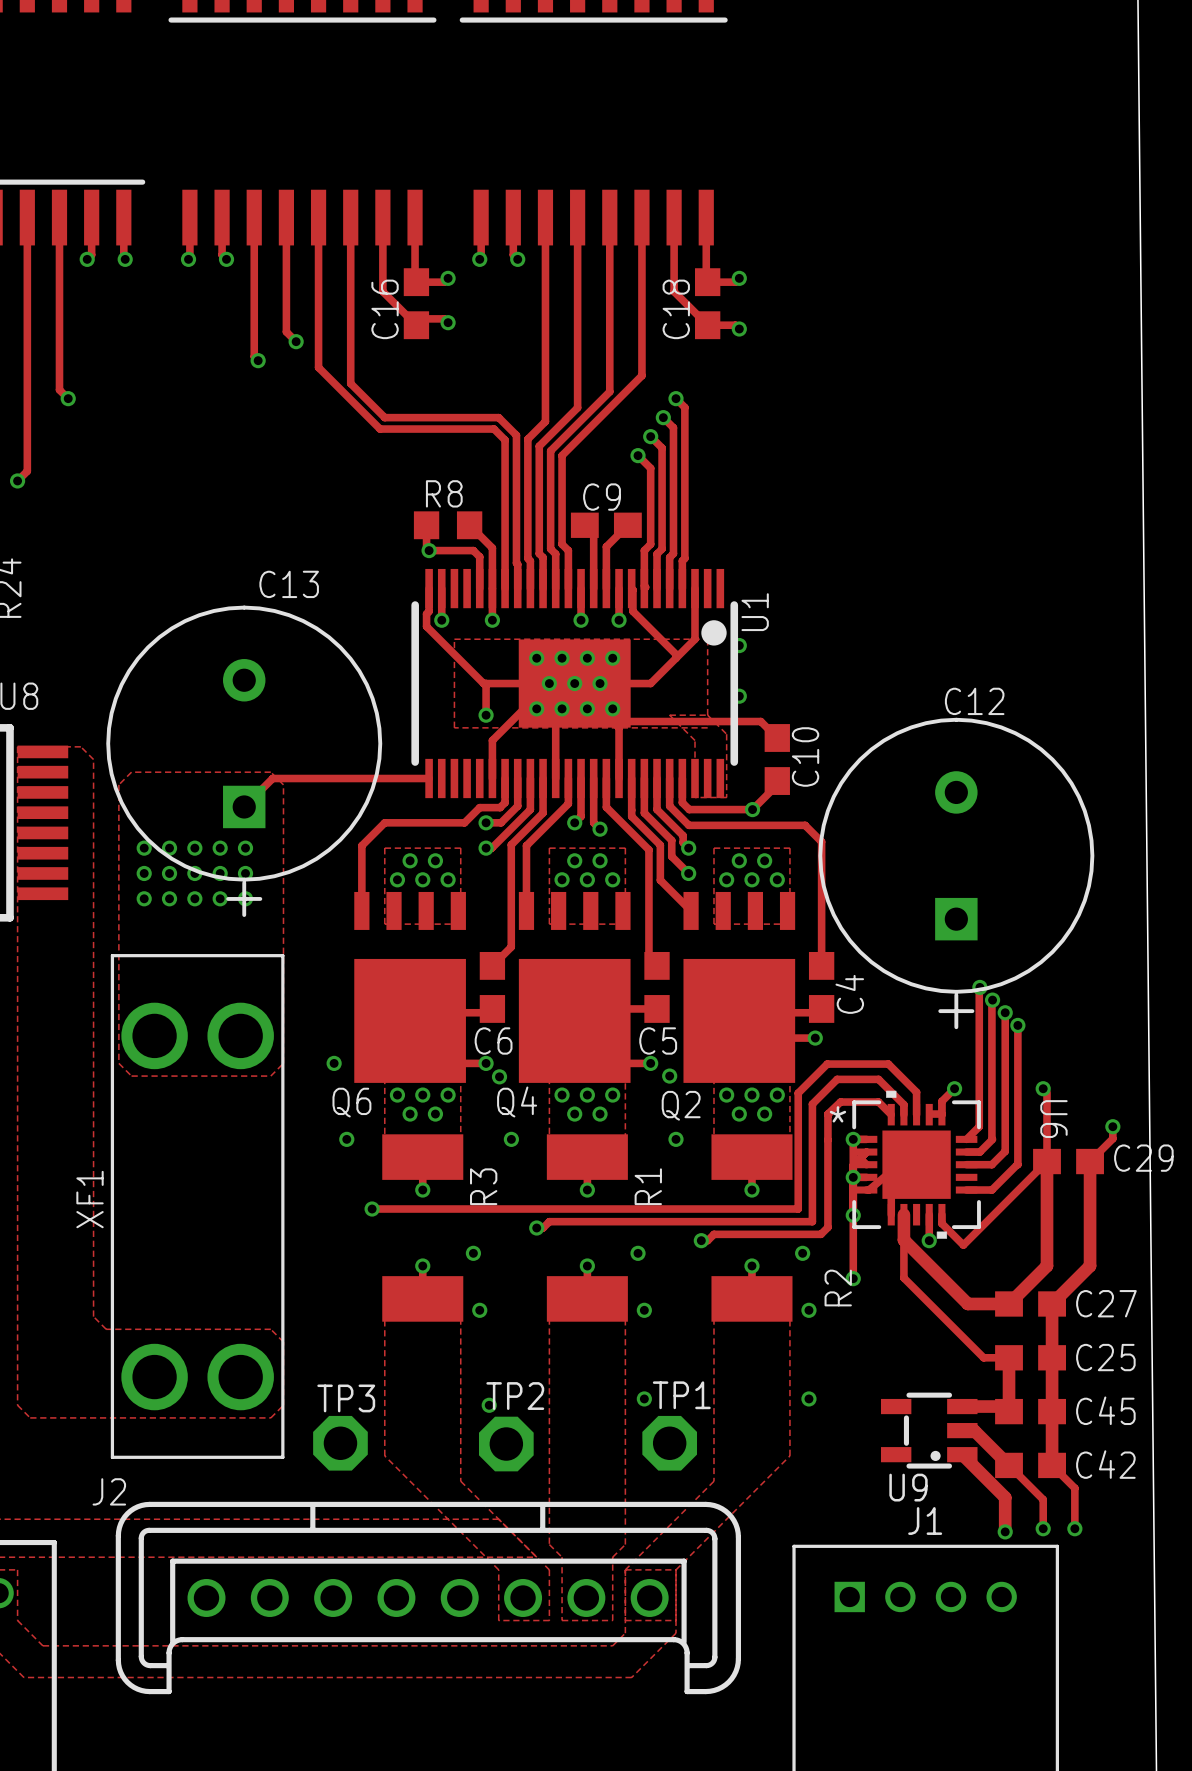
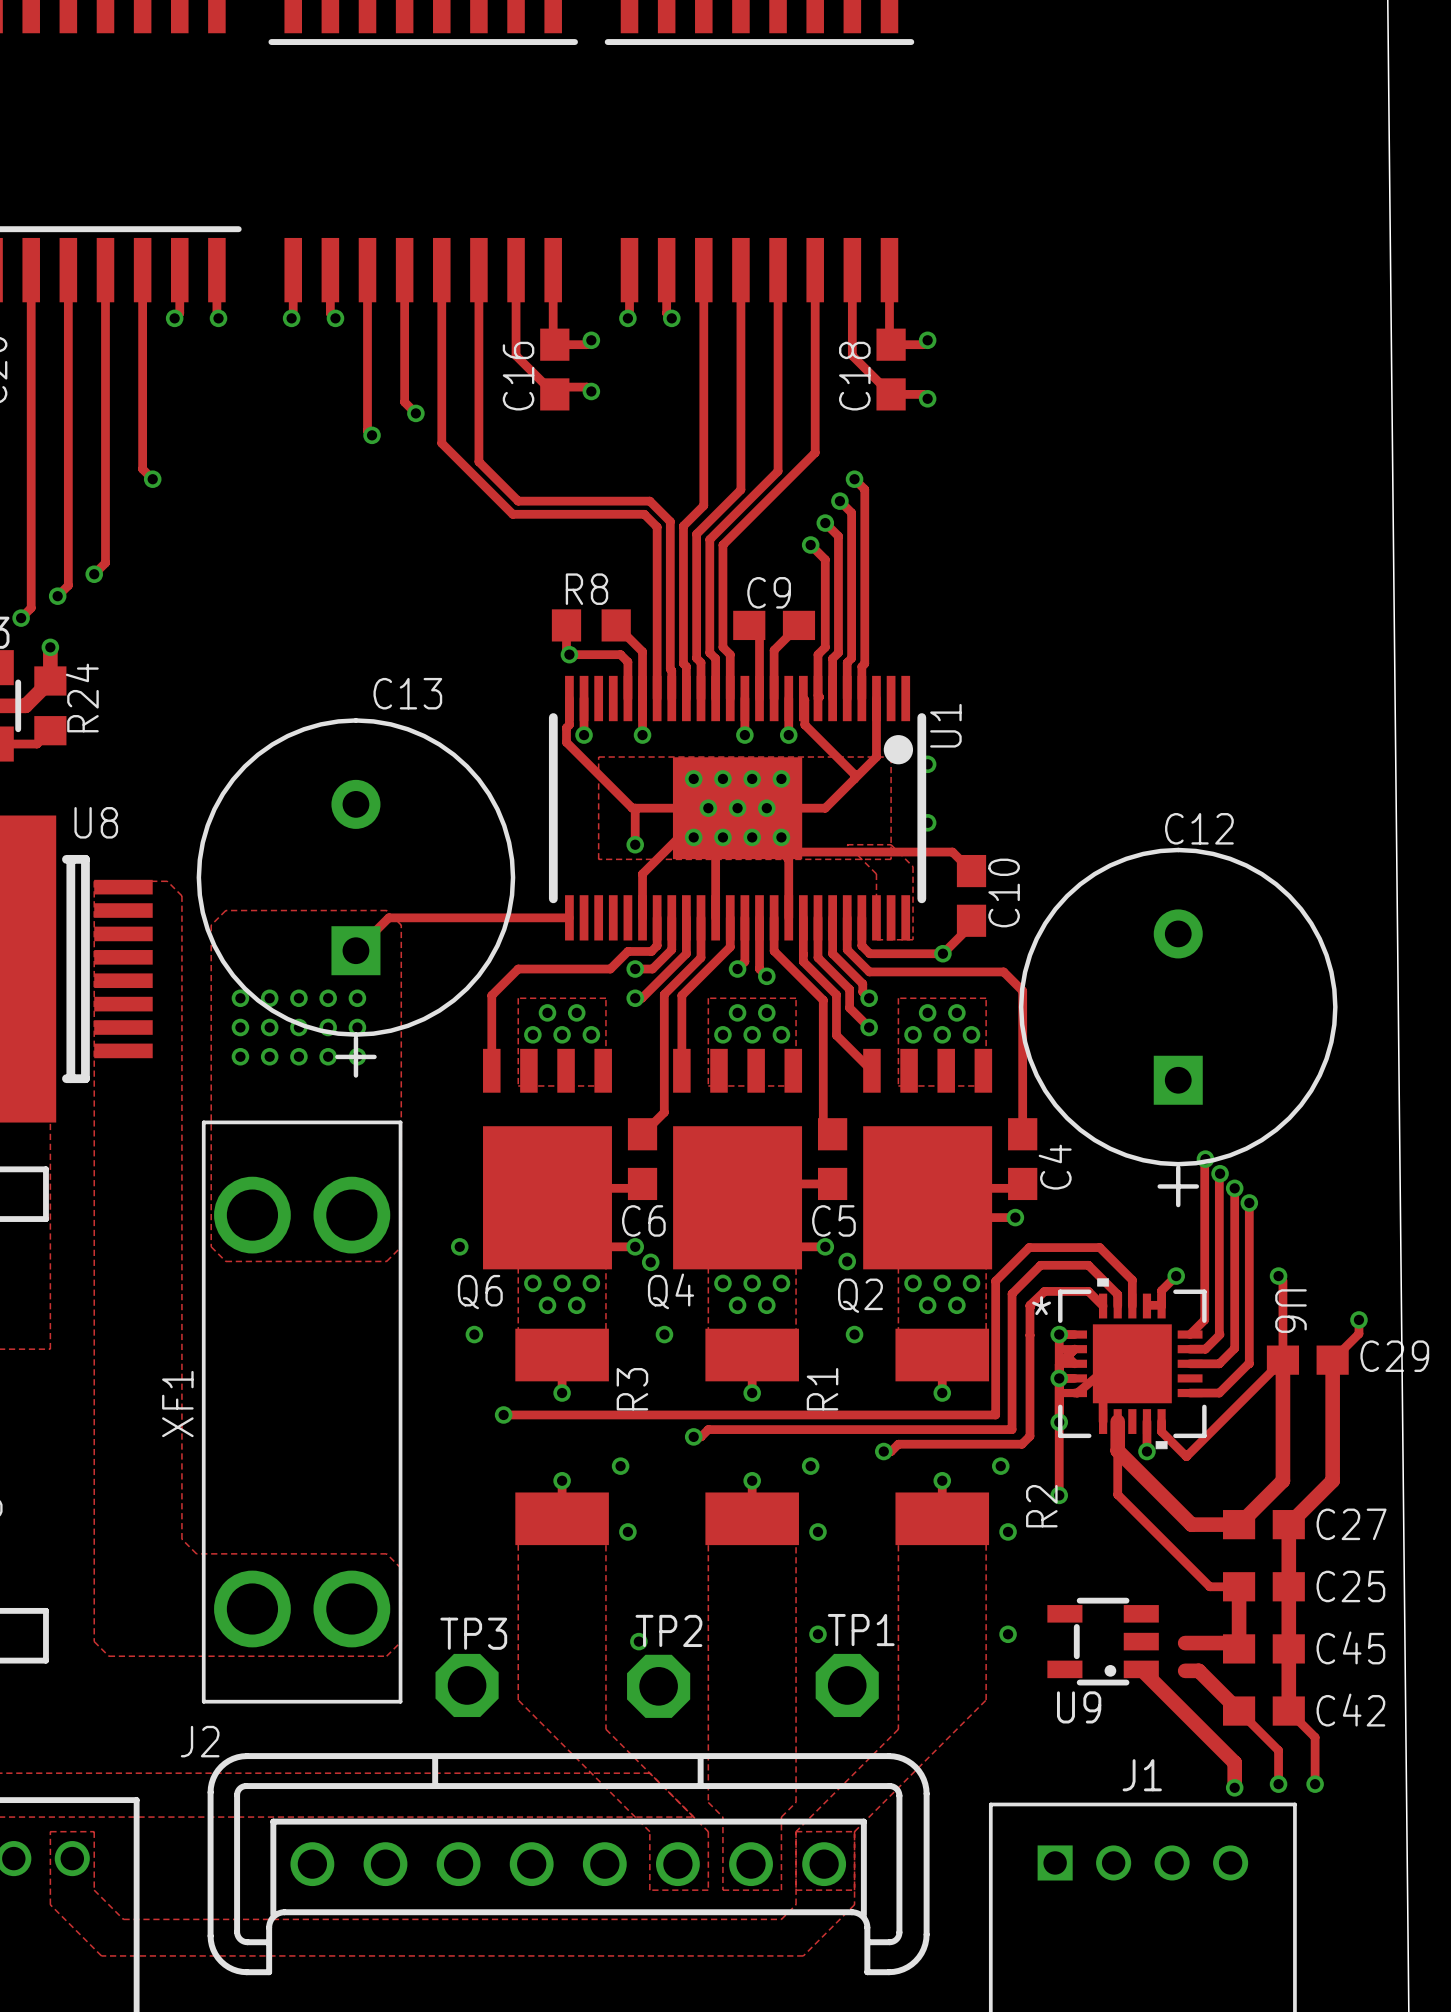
U9 position: (929, 1430) -> (1103, 1641)
track: (962, 1454) (1005, 1497) (1005, 1510) -> (1141, 1669) (1234, 1762)

